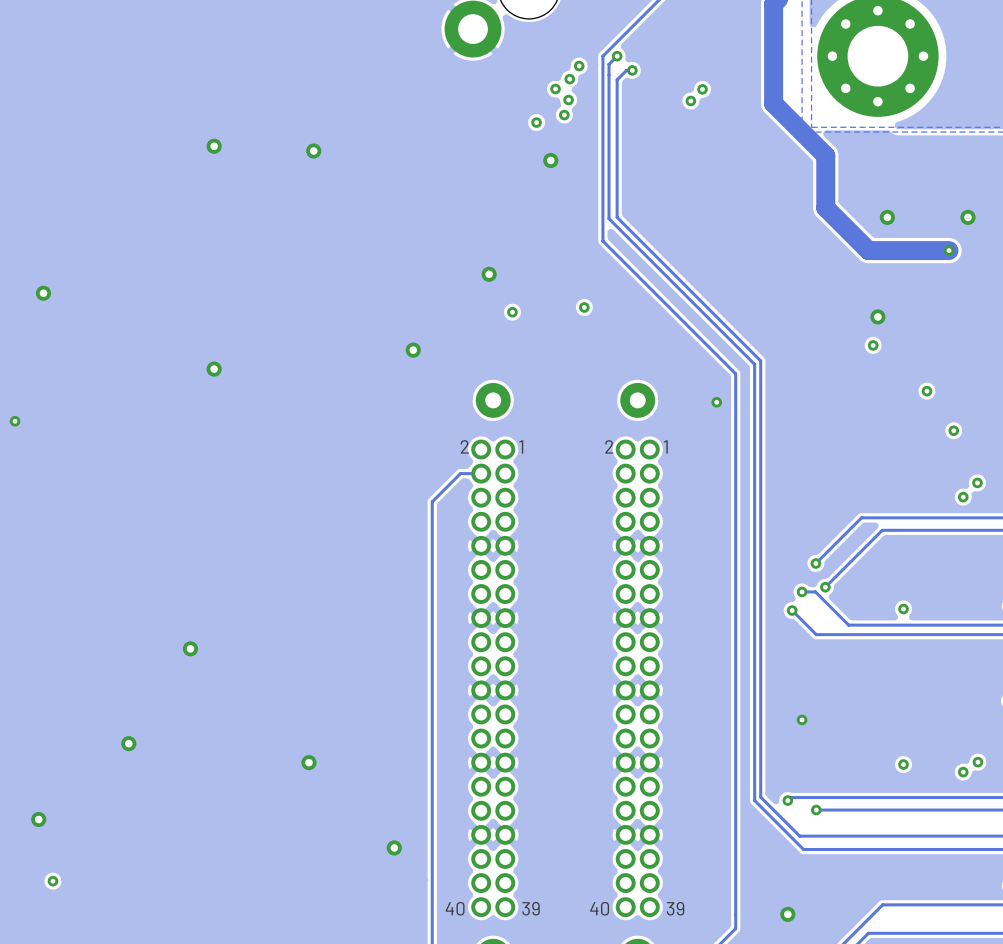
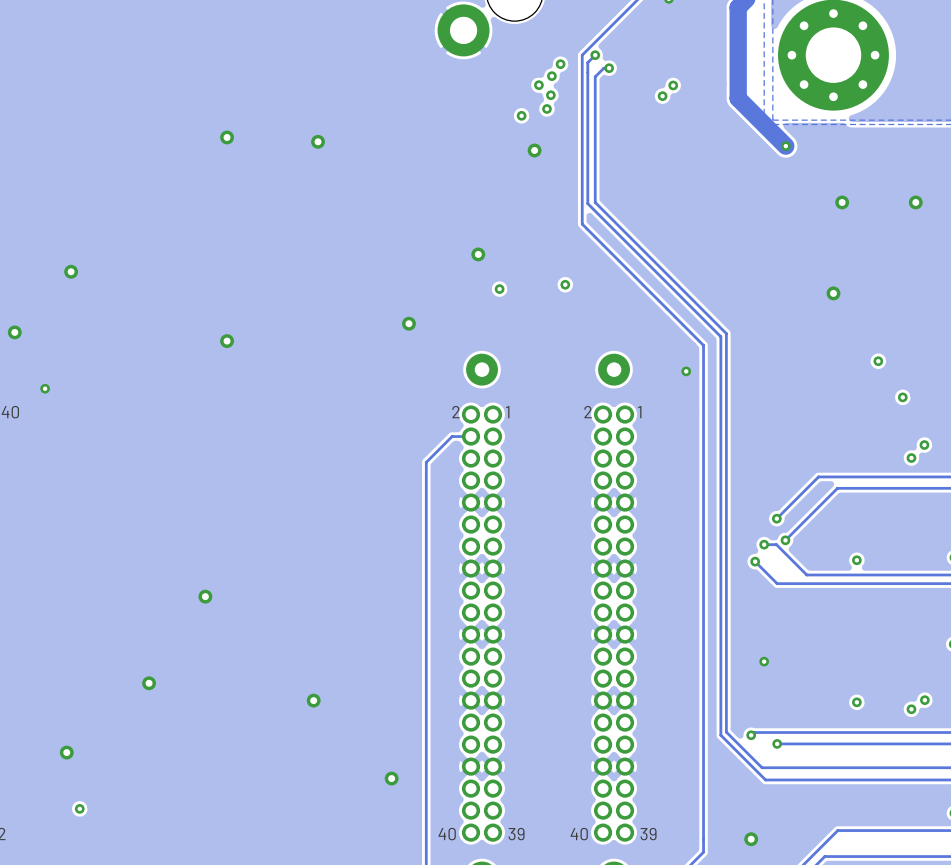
track: (825, 155) (825, 207) (868, 250) (949, 250) -> none
via: none -> (785, 146)
via: (949, 250) -> none
via: (873, 345) -> none

